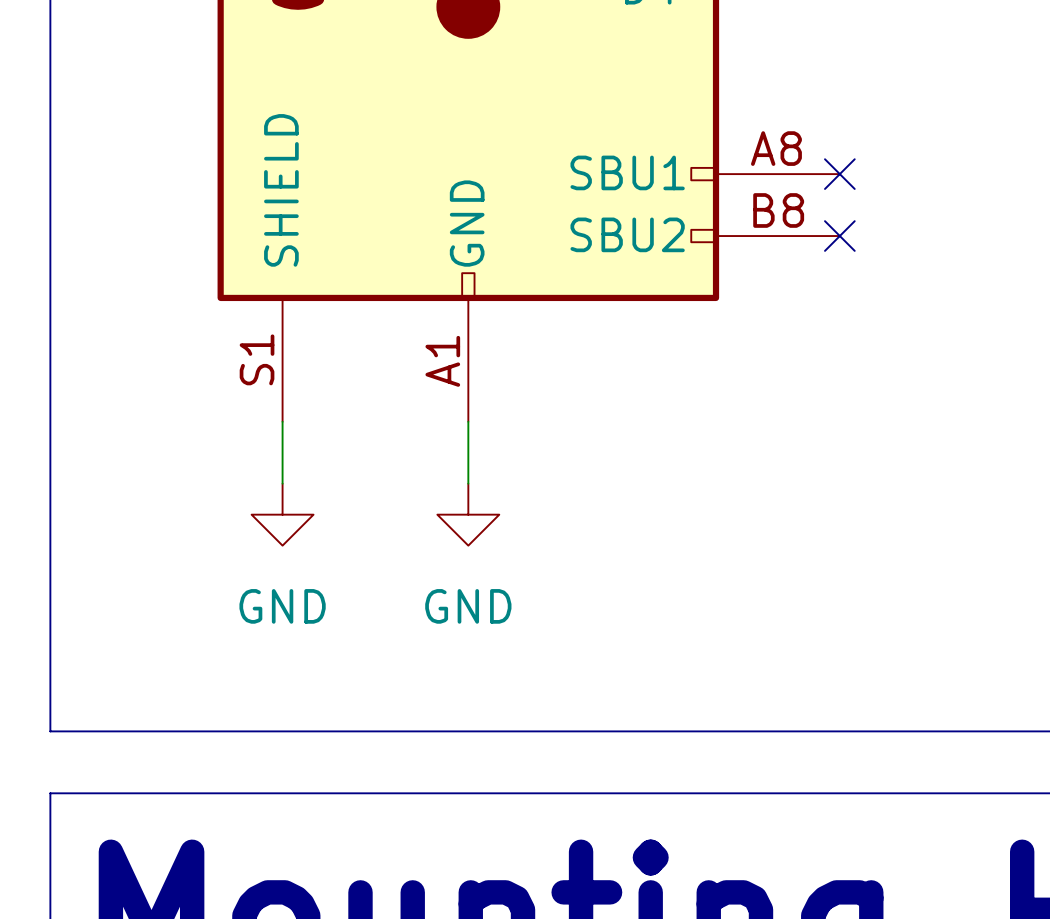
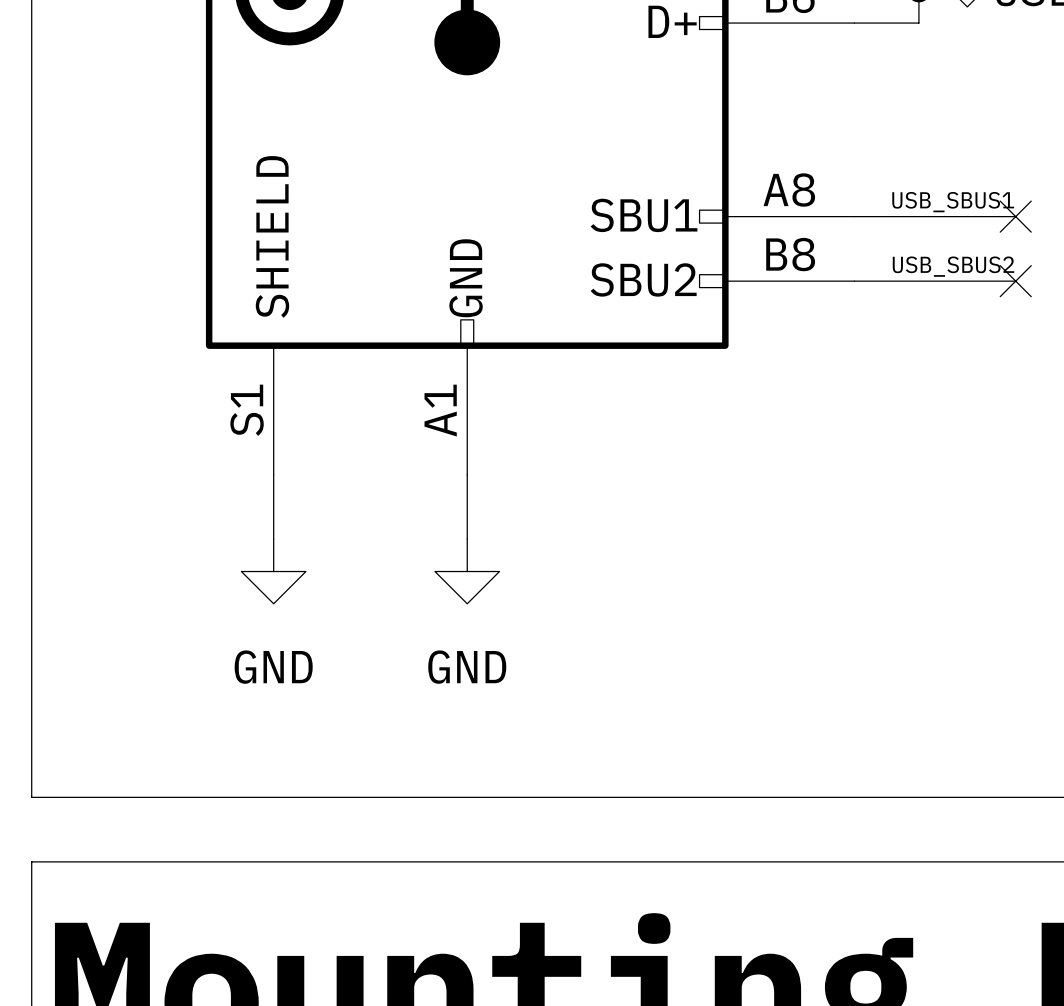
label: none -> USB_SBUS1 (953, 202)
wire: none -> (854, 216) (1015, 216)
no-connect mark: (839, 174) -> none
no-connect mark: none -> (1015, 216)
label: none -> USB_SBUS2 (953, 266)
wire: none -> (854, 281) (1015, 281)
no-connect mark: (839, 236) -> none
no-connect mark: none -> (1015, 281)

